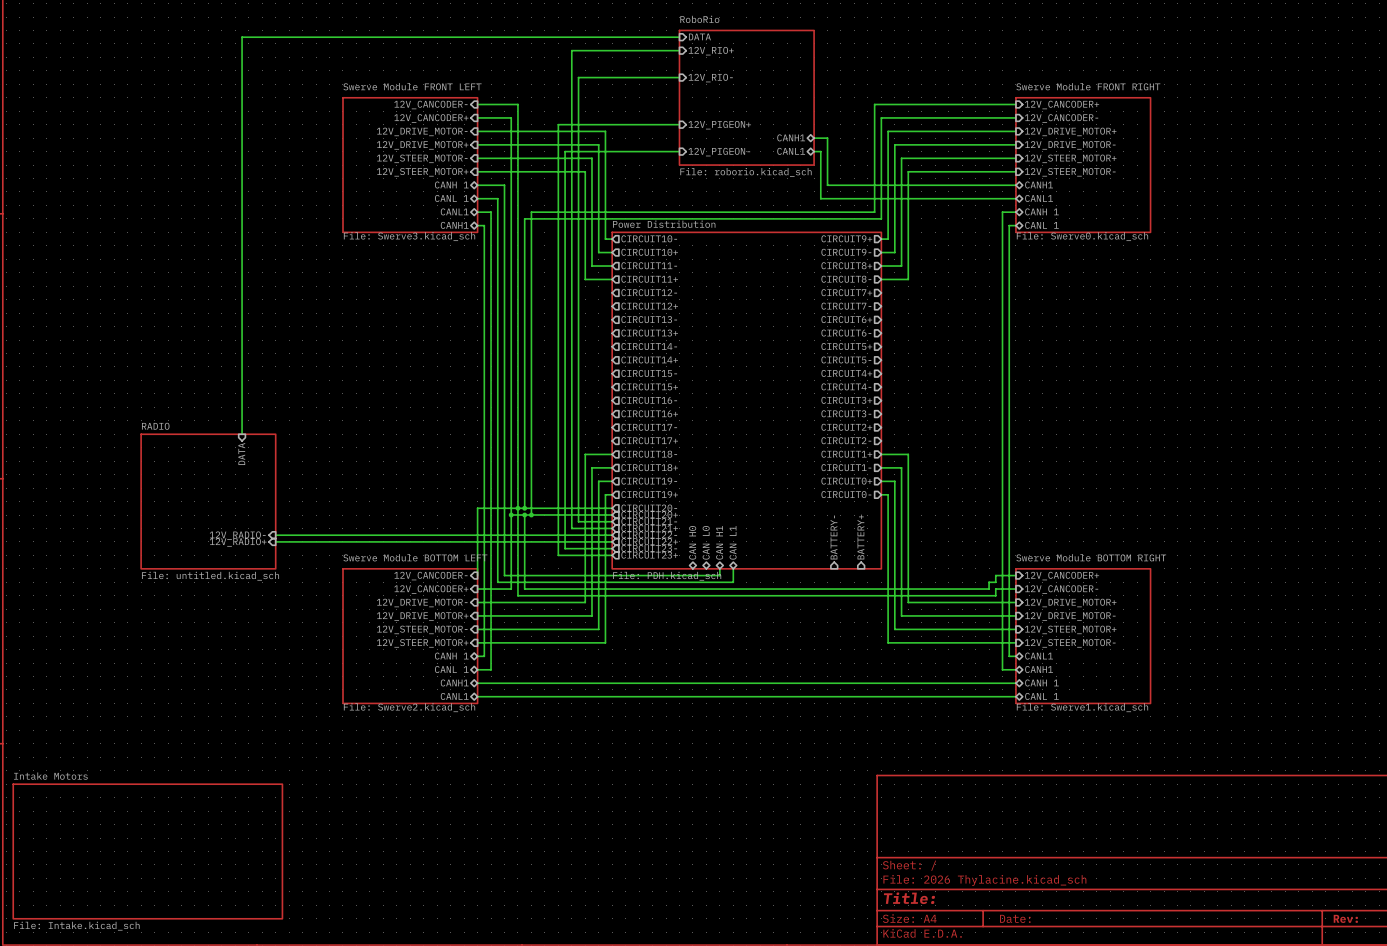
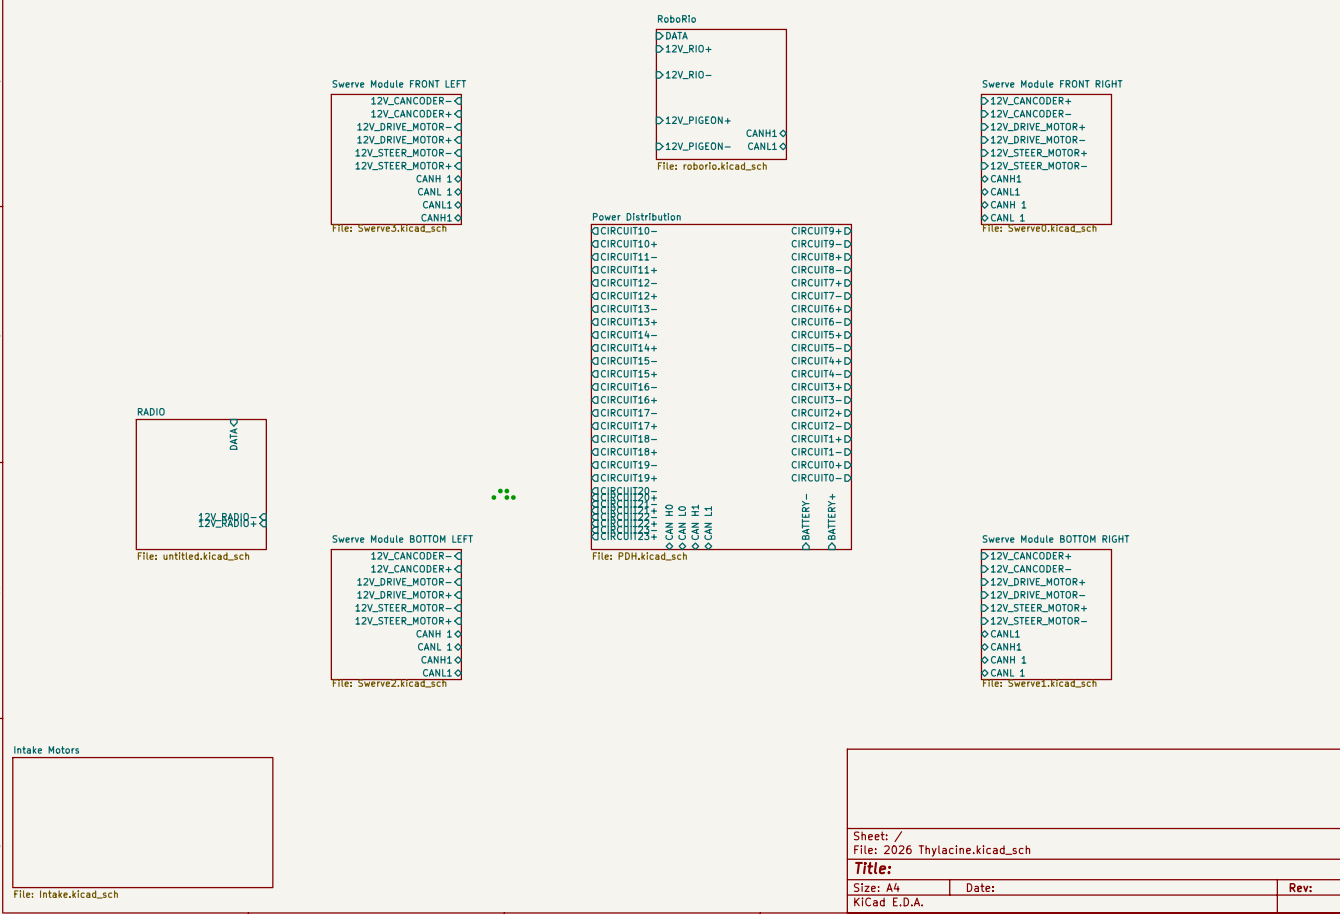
wire: (679, 37) (242, 37) (242, 434) -> none
wire: (679, 50) (571, 50) (571, 528) (612, 528) -> none
wire: (679, 77) (578, 77) (578, 521) (612, 521) -> none
wire: (477, 104) (517, 104) (517, 595) (995, 595) (995, 589) (1015, 589) -> none
wire: (1015, 104) (874, 104) (874, 212) (531, 212) (531, 515) -> none
wire: (477, 117) (511, 117) (511, 589) (477, 589) -> none
wire: (1015, 117) (881, 117) (881, 218) (524, 218) (524, 508) -> none
wire: (679, 124) (558, 124) (558, 555) (612, 555) -> none
wire: (477, 131) (605, 131) (605, 239) (612, 239) -> none
wire: (1015, 131) (888, 131) (888, 239) (881, 239) -> none
wire: (814, 138) (827, 138) (827, 185) (1015, 185) -> none
wire: (477, 144) (598, 144) (598, 252) (612, 252) -> none
wire: (1015, 144) (894, 144) (894, 252) (881, 252) -> none
wire: (679, 151) (565, 151) (565, 548) (612, 548) -> none
wire: (814, 151) (820, 151) (820, 198) (1015, 198) -> none
wire: (477, 158) (591, 158) (591, 266) (612, 266) -> none
wire: (1015, 158) (901, 158) (901, 266) (881, 266) -> none
wire: (477, 171) (585, 171) (585, 279) (612, 279) -> none
wire: (1015, 171) (908, 171) (908, 279) (881, 279) -> none
wire: (477, 185) (504, 185) (504, 575) (719, 575) (719, 568) -> none
wire: (477, 198) (497, 198) (497, 582) (733, 582) (733, 568) -> none
wire: (477, 212) (491, 212) (491, 669) (477, 669) -> none
wire: (1015, 212) (1002, 212) (1002, 669) (1015, 669) -> none
wire: (477, 225) (484, 225) (484, 656) (477, 656) -> none
wire: (1015, 225) (1009, 225) (1009, 656) (1015, 656) -> none
wire: (612, 454) (585, 454) (585, 602) (477, 602) -> none
wire: (881, 454) (908, 454) (908, 602) (1015, 602) -> none
wire: (612, 467) (591, 467) (591, 615) (477, 615) -> none
wire: (881, 467) (901, 467) (901, 615) (1015, 615) -> none
wire: (612, 481) (598, 481) (598, 629) (477, 629) -> none
wire: (881, 481) (894, 481) (894, 629) (1015, 629) -> none
wire: (612, 494) (605, 494) (605, 642) (477, 642) -> none
wire: (881, 494) (888, 494) (888, 642) (1015, 642) -> none
wire: (612, 508) (477, 508) (477, 575) -> none
wire: (511, 515) (612, 515) -> none
wire: (524, 515) (524, 589) (989, 589) (989, 582) (995, 582) (995, 575) (1015, 575) -> none
wire: (275, 535) (612, 535) -> none
wire: (275, 541) (612, 541) -> none
wire: (477, 683) (1015, 683) -> none
wire: (477, 696) (1015, 696) -> none

